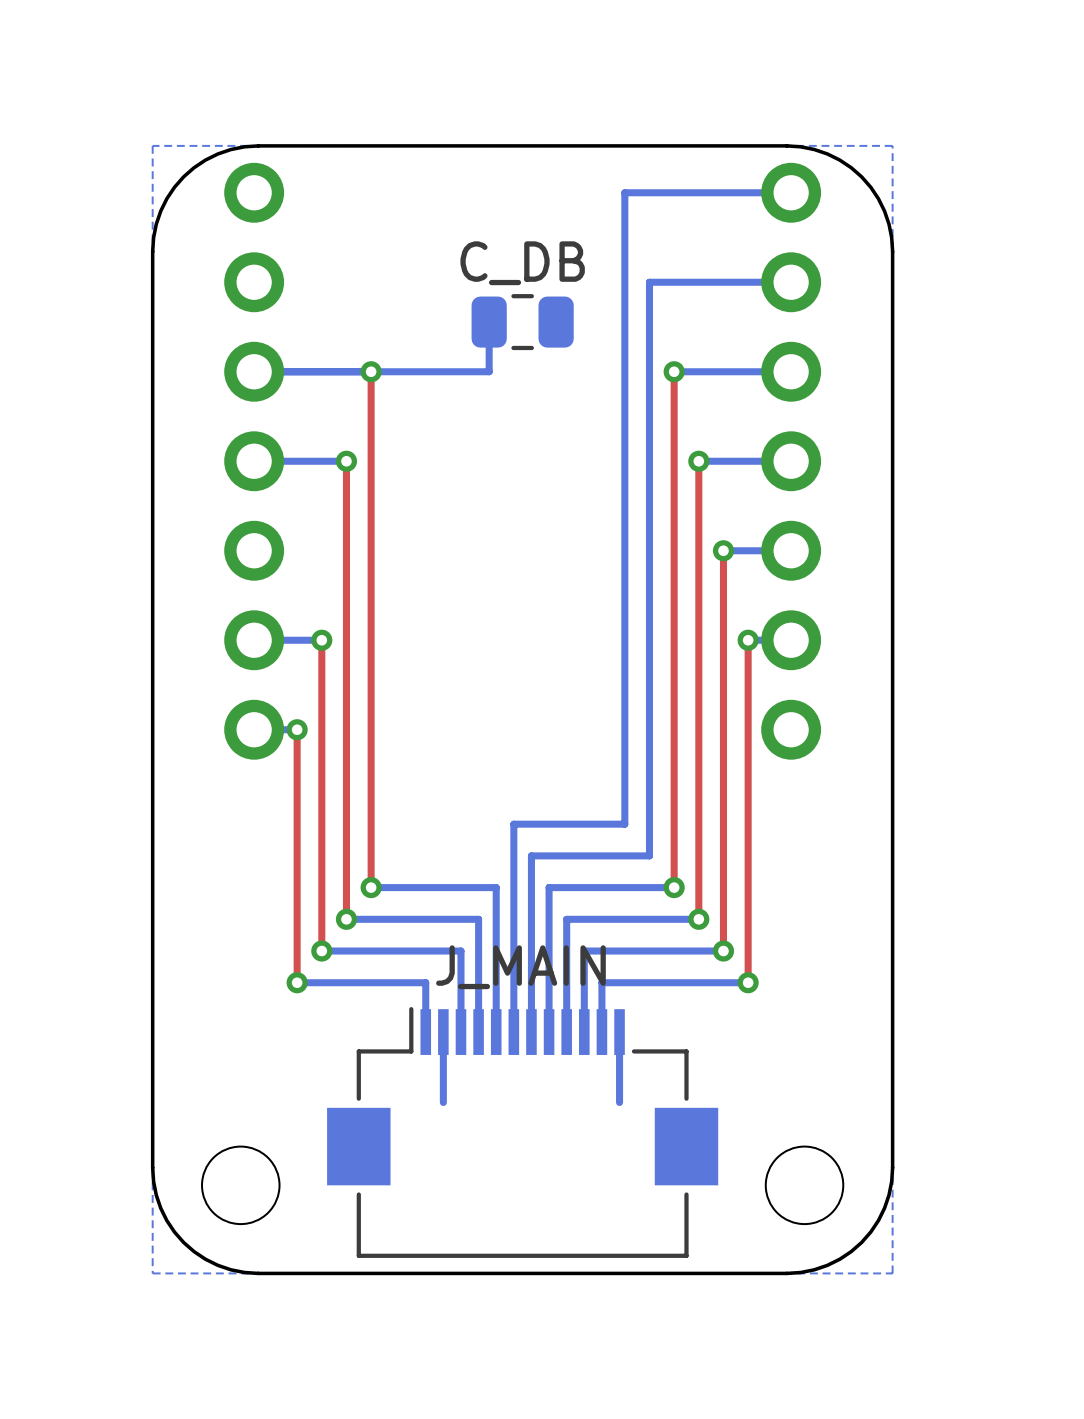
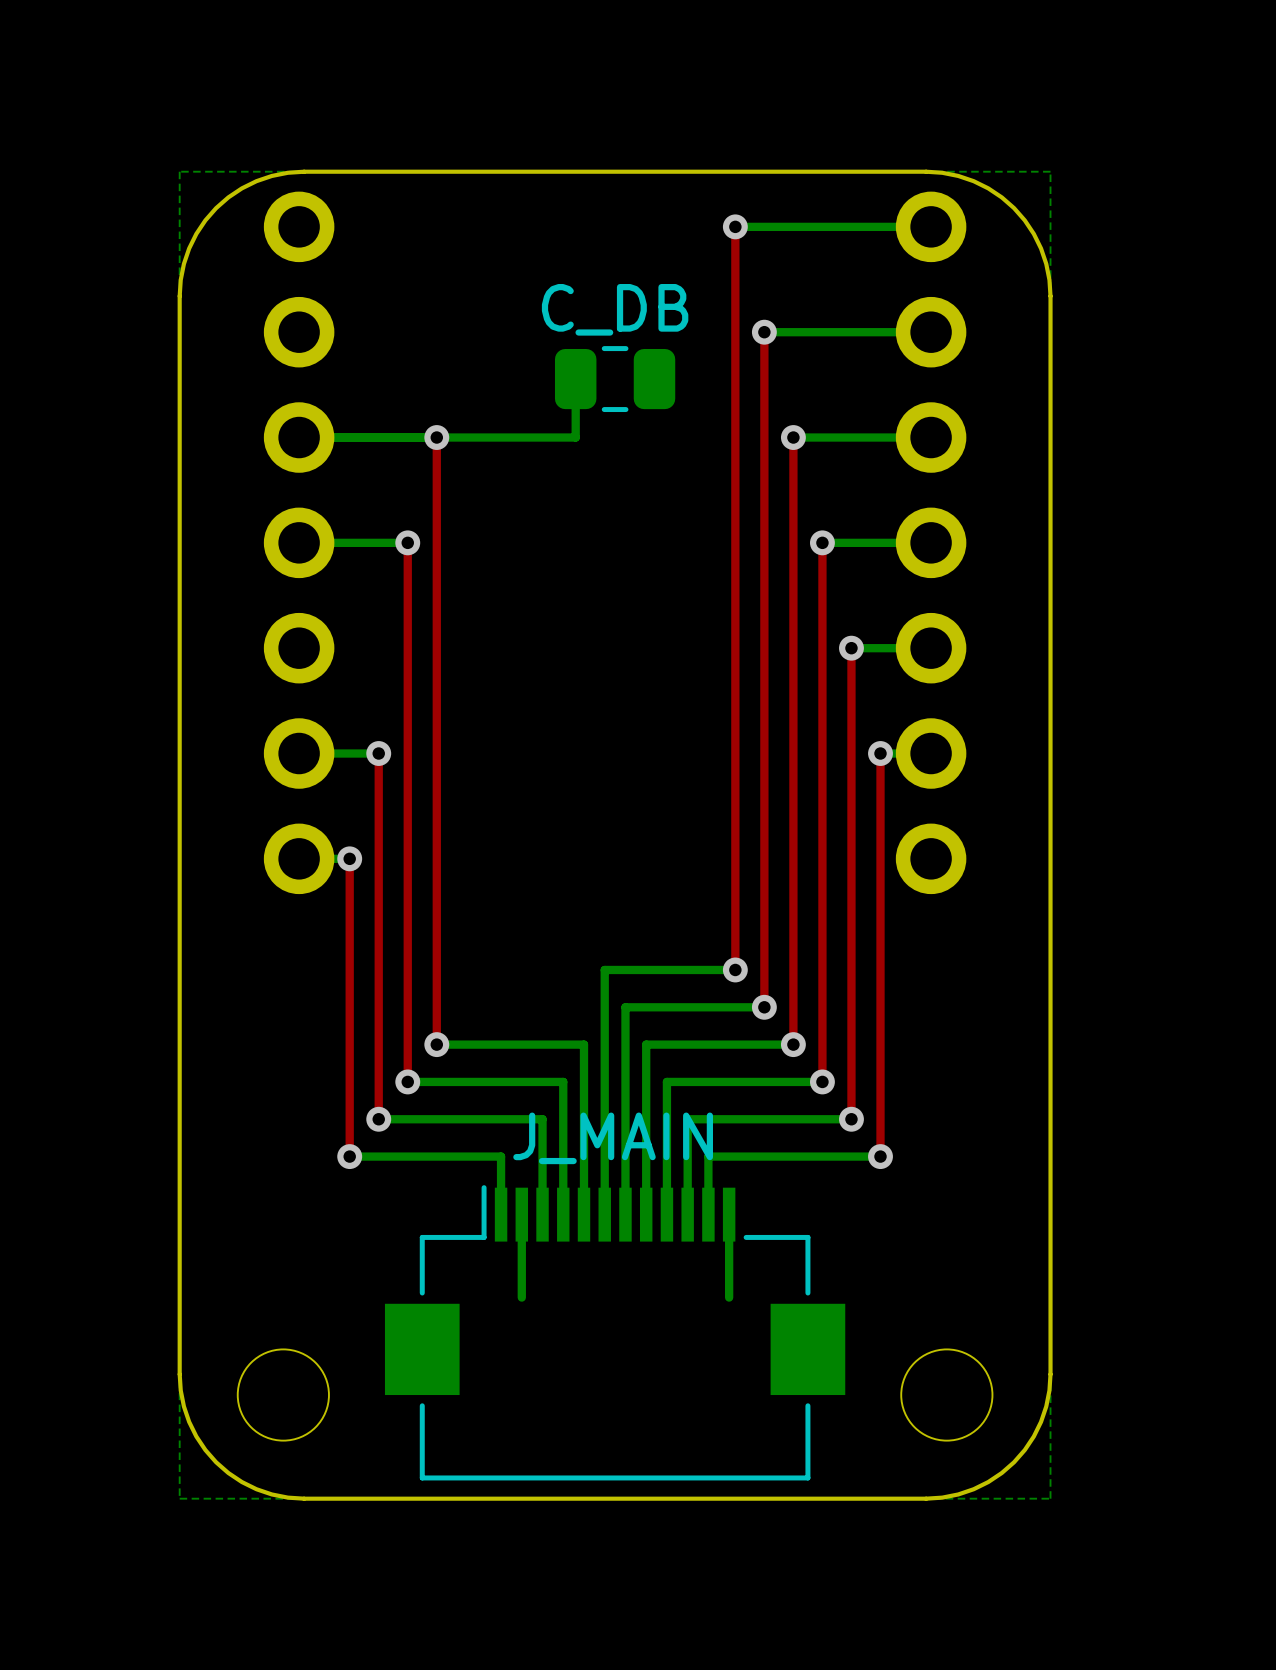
top track: none -> (735, 226) (735, 969)
bottom track: (624, 192) (624, 824) -> none
via: none -> (735, 226)
top track: none -> (764, 332) (764, 1007)
bottom track: (649, 282) (649, 855) -> none
via: none -> (764, 332)
via: none -> (735, 969)
via: none -> (764, 1007)

